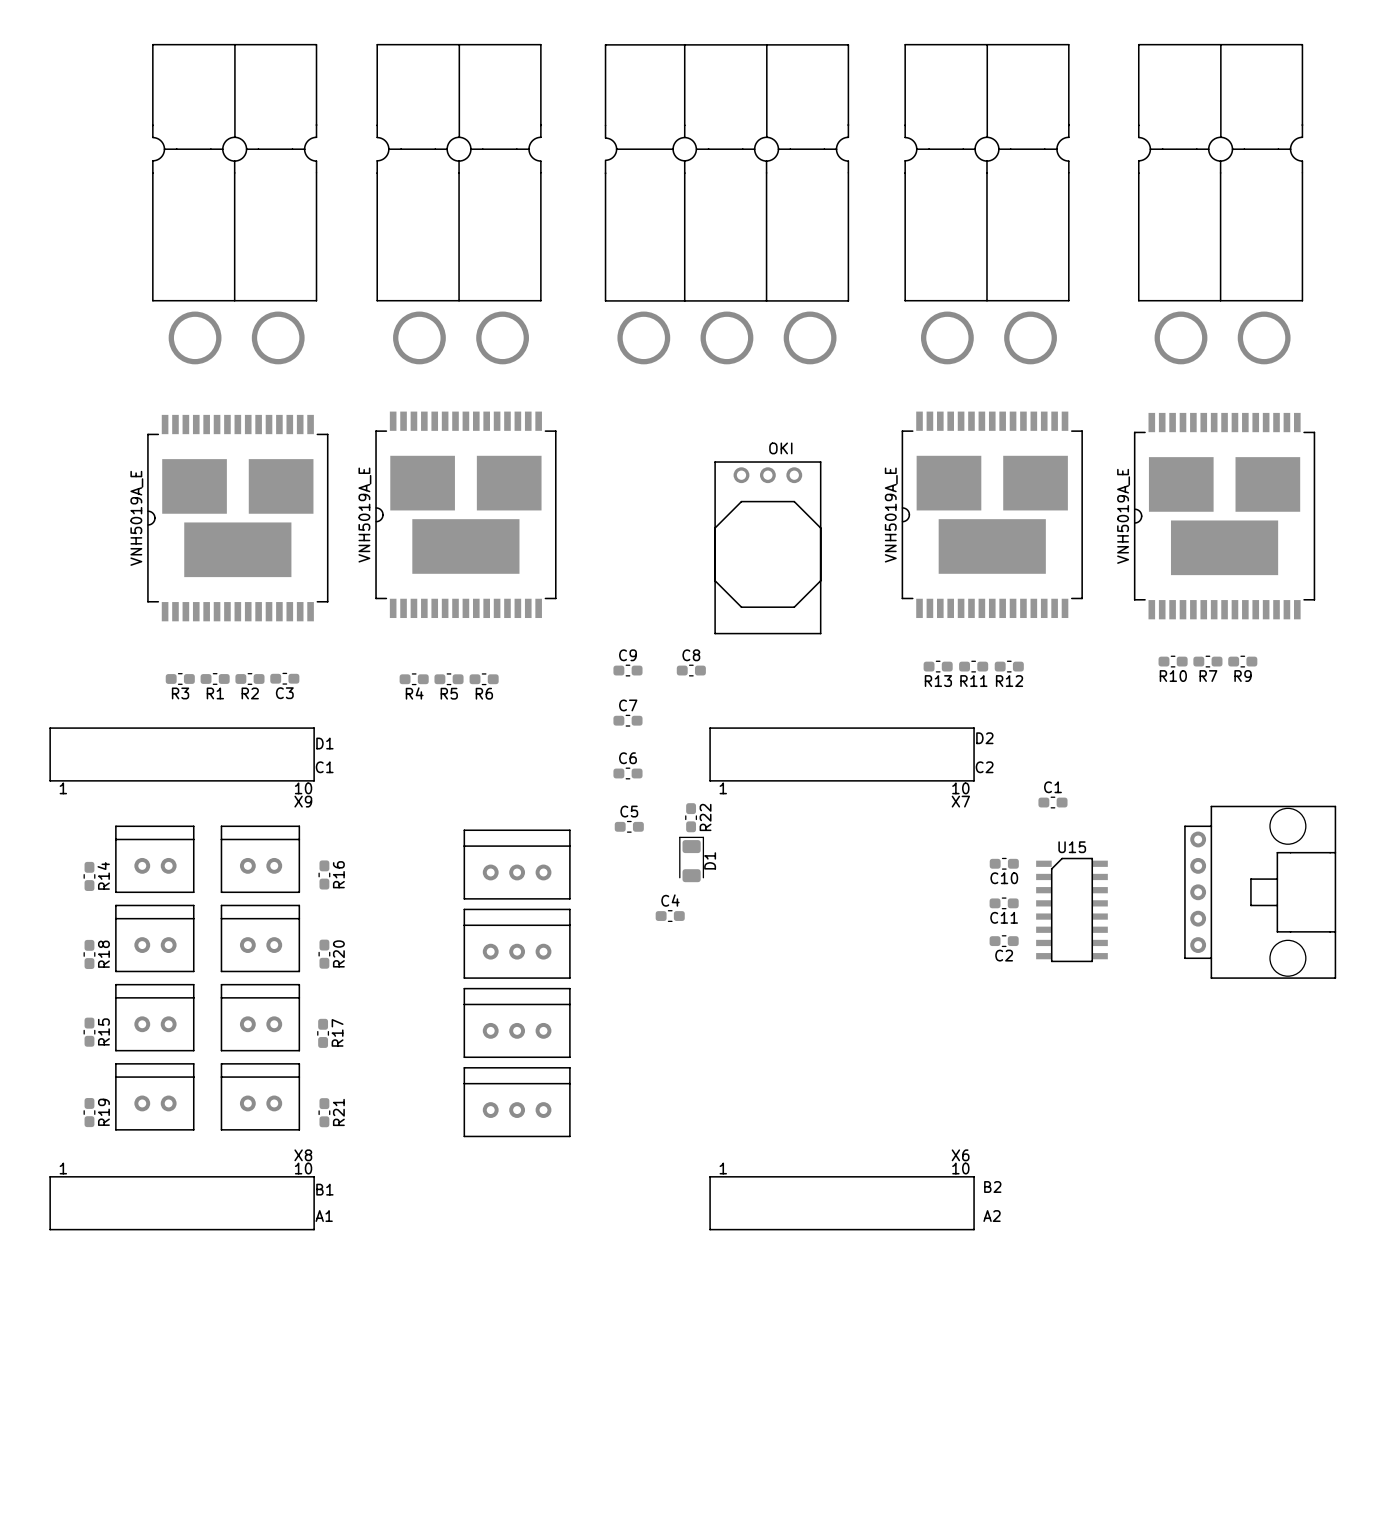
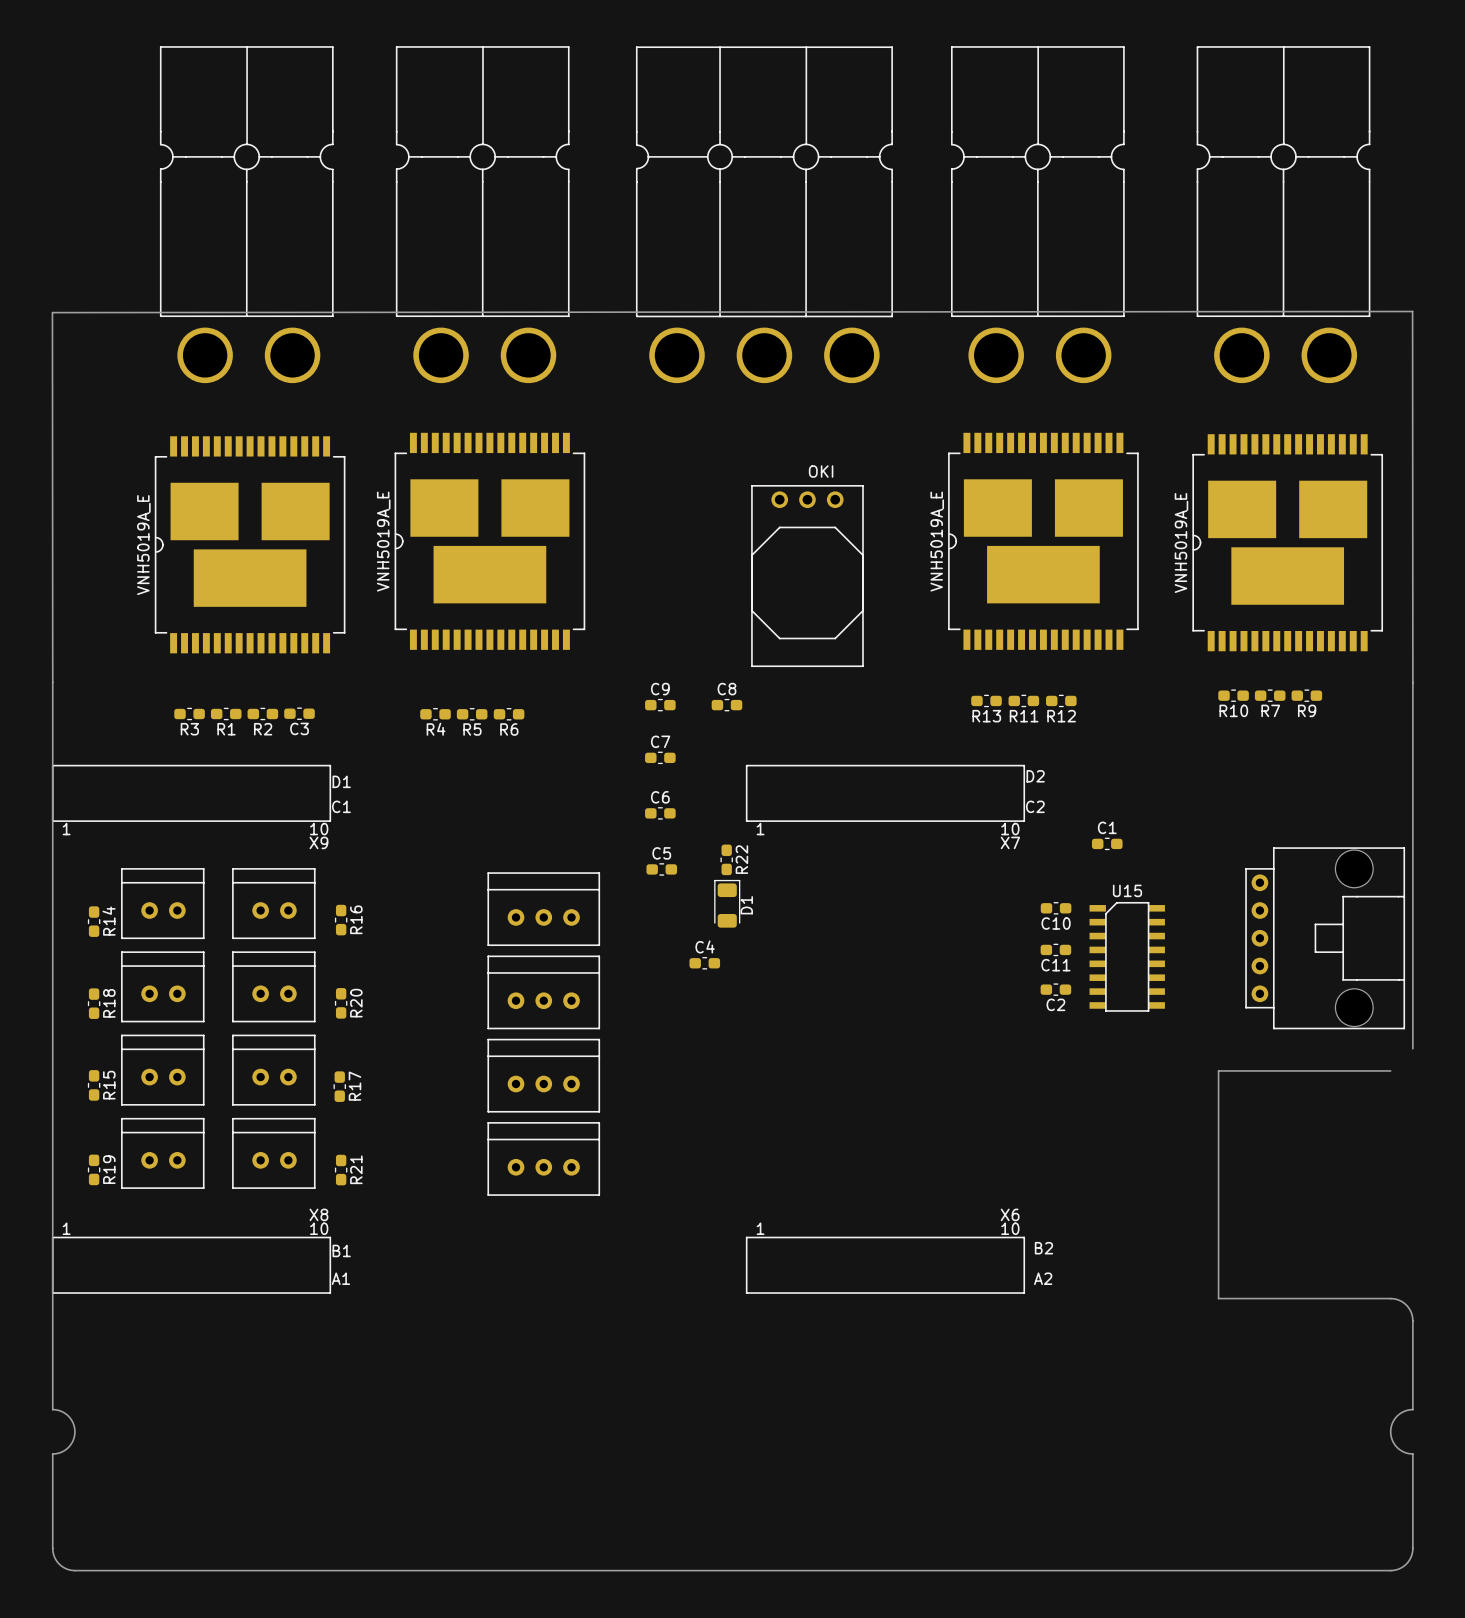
board edge: none -> (52, 312) (52, 1409) (61, 1411) (68, 1416) (73, 1423) (74, 1431) (73, 1440) (68, 1447) (61, 1452) (52, 1454) (52, 1551) (57, 1561) (63, 1567) (74, 1570) (1390, 1570) (1399, 1568) (1408, 1561) (1412, 1551) (1412, 1454) (1404, 1452) (1397, 1447) (1392, 1440) (1390, 1431) (1392, 1423) (1397, 1416) (1404, 1411) (1412, 1409) (1412, 1320) (1409, 1309) (1401, 1301) (1390, 1298) (1218, 1298) (1218, 1070) (1390, 1070)
board edge: none -> (52, 312) (1412, 311) (1412, 682)
board edge: none -> (1412, 682) (1412, 1048)

